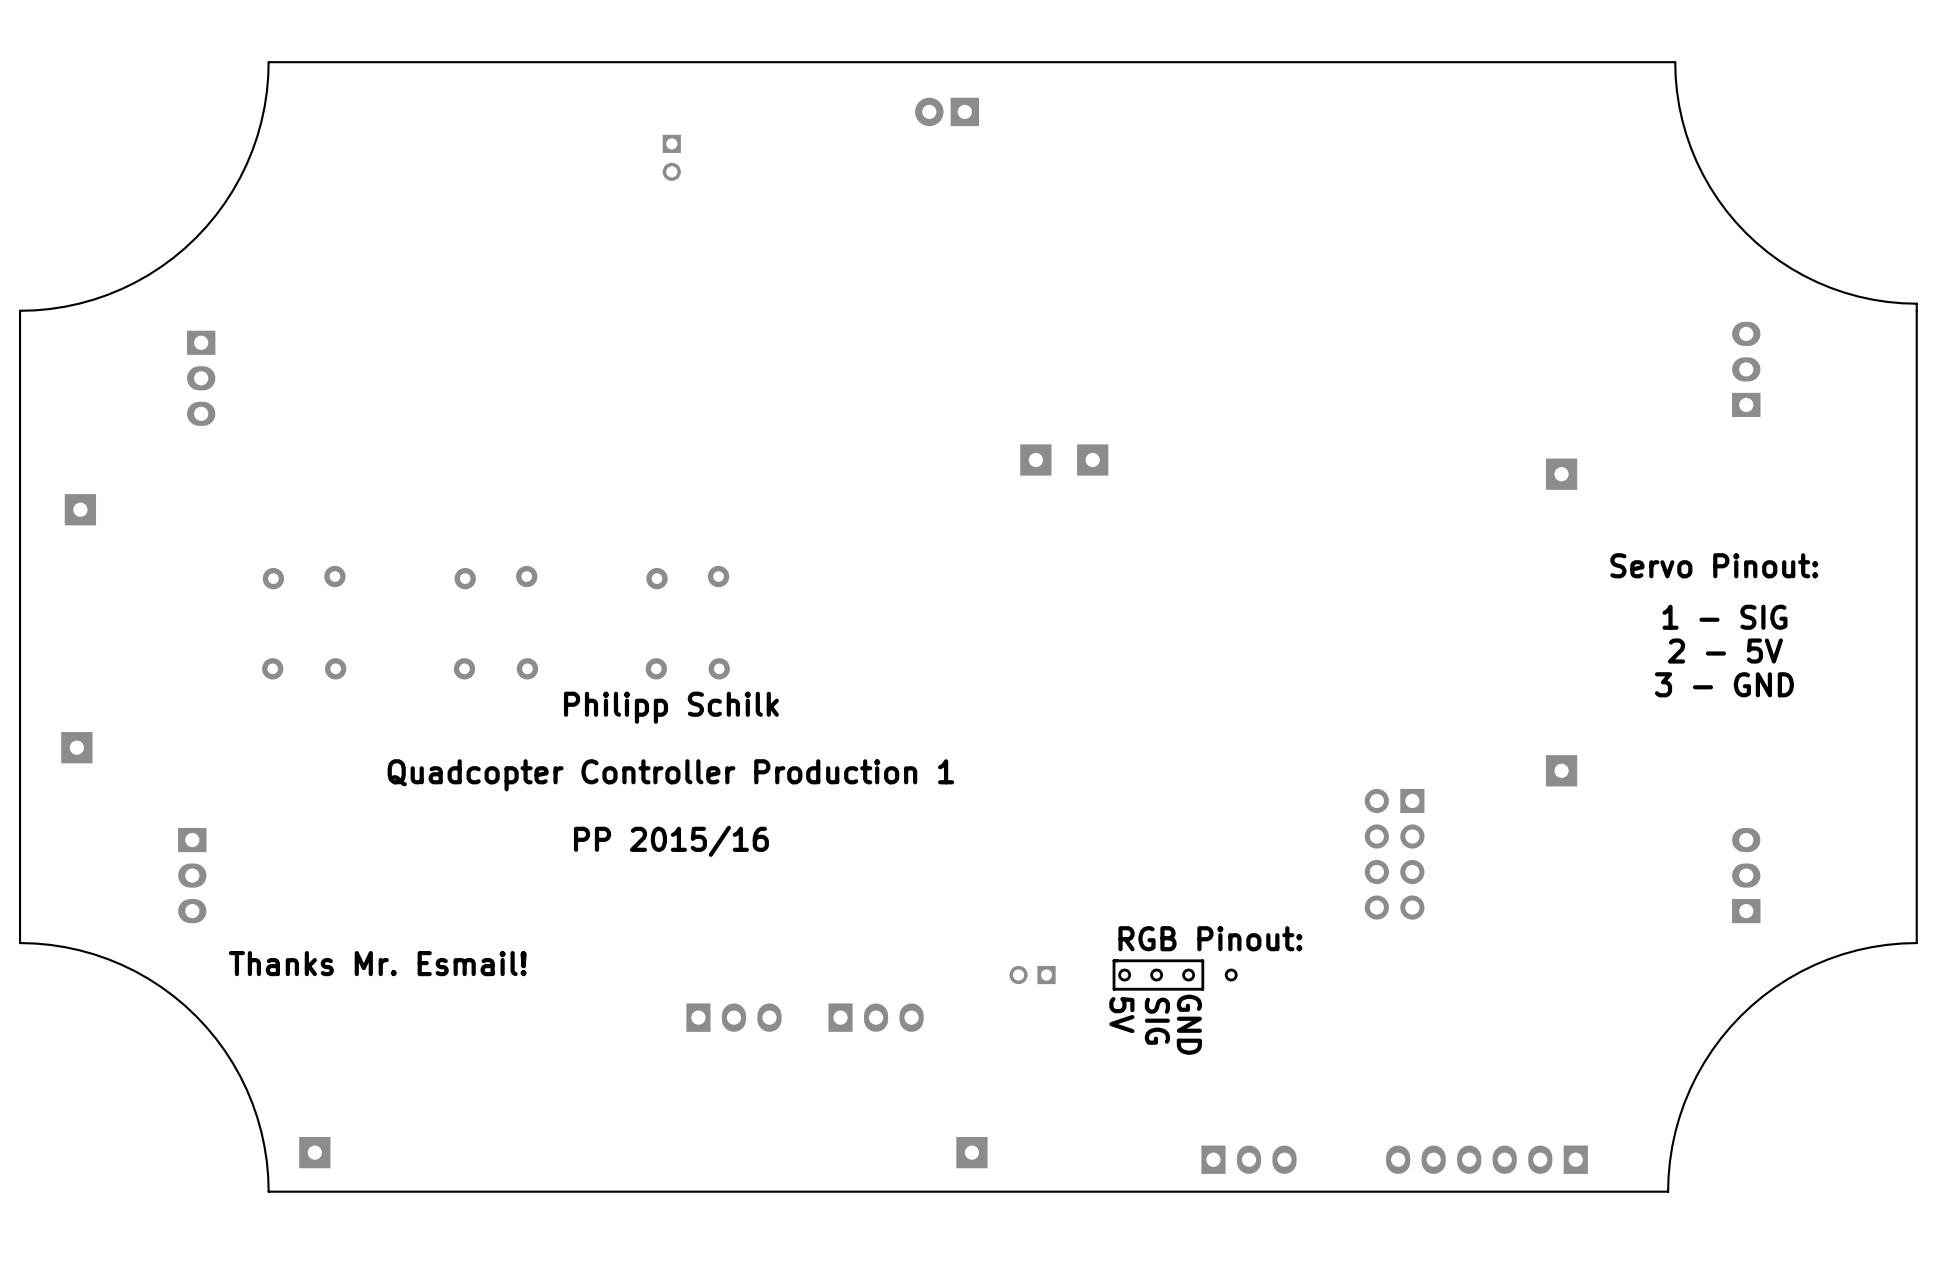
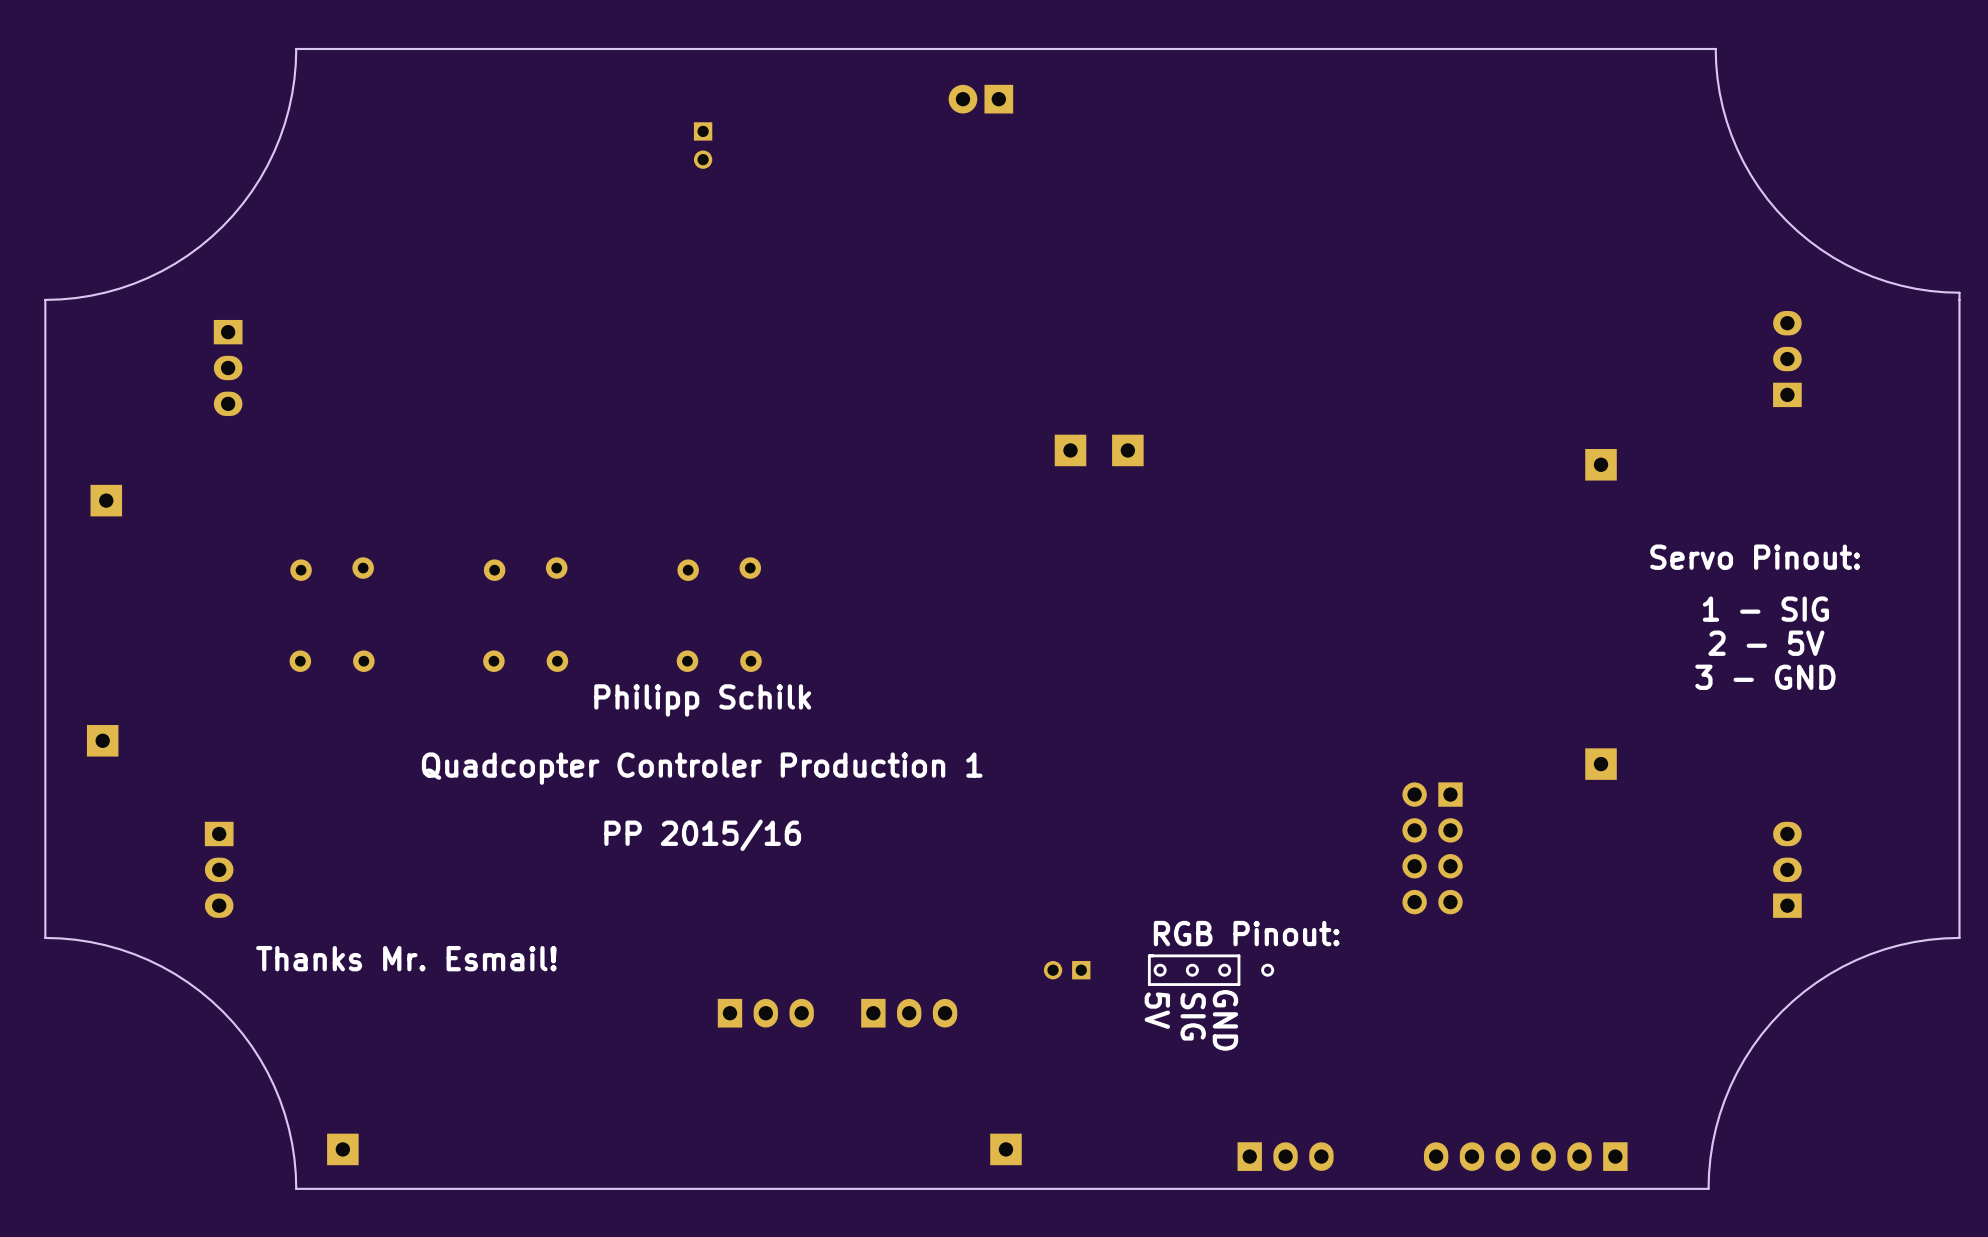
text: Quadcopter Controller Production 1 (670, 775) -> Quadcopter Controler Production 1 (702, 768)

